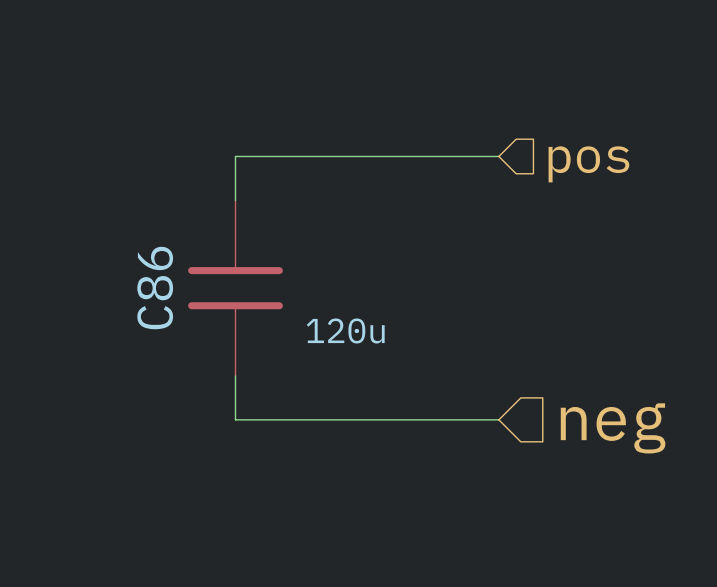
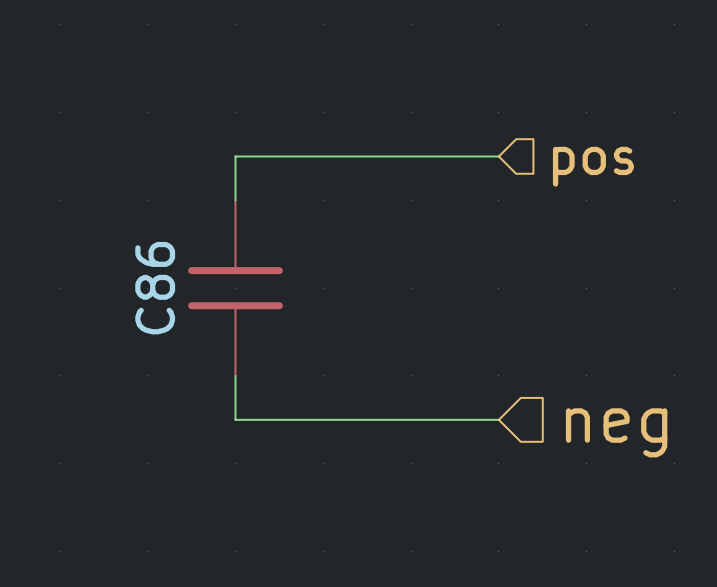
C86 value: 120u (345, 330) -> none

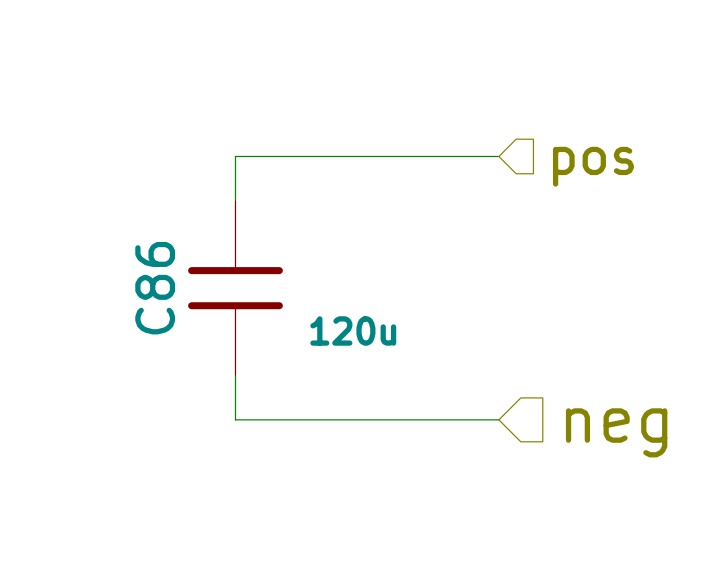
C86 value: none -> 120u (353, 330)

